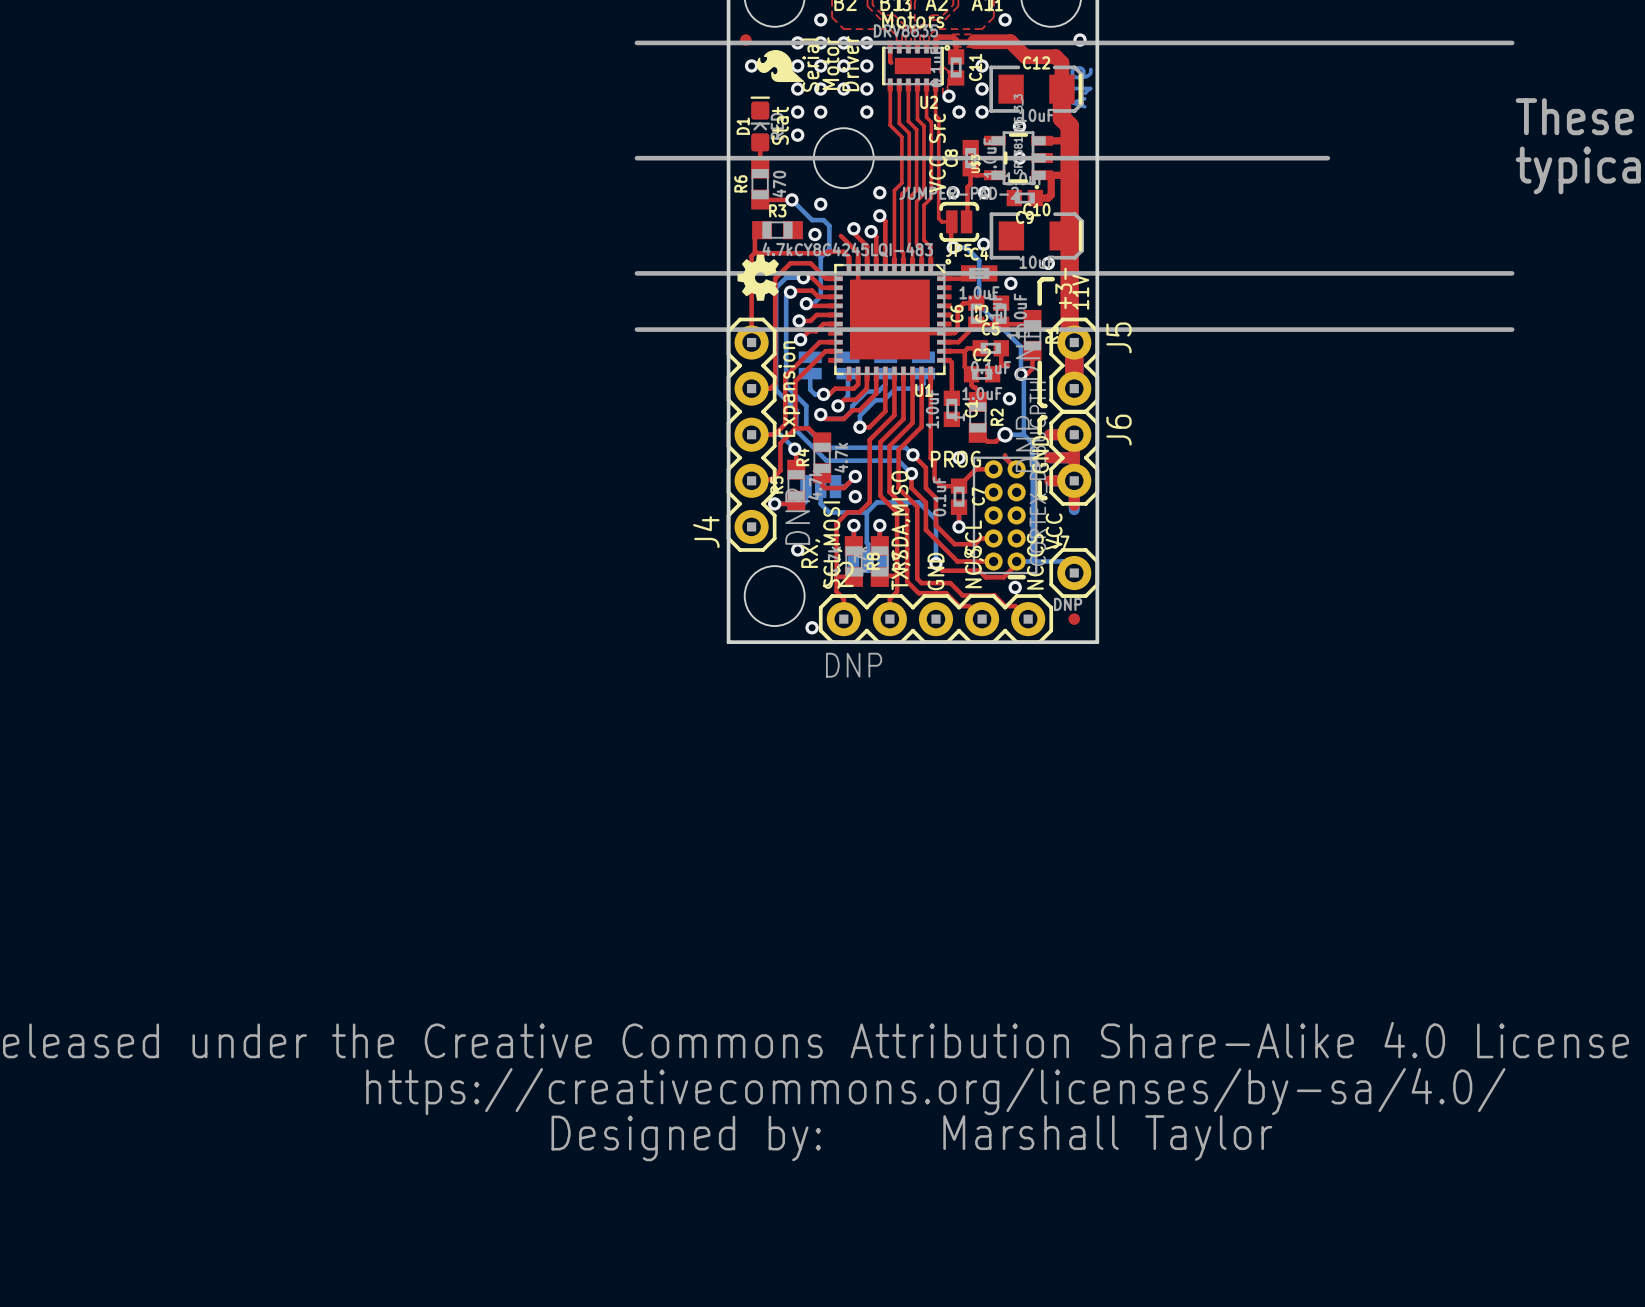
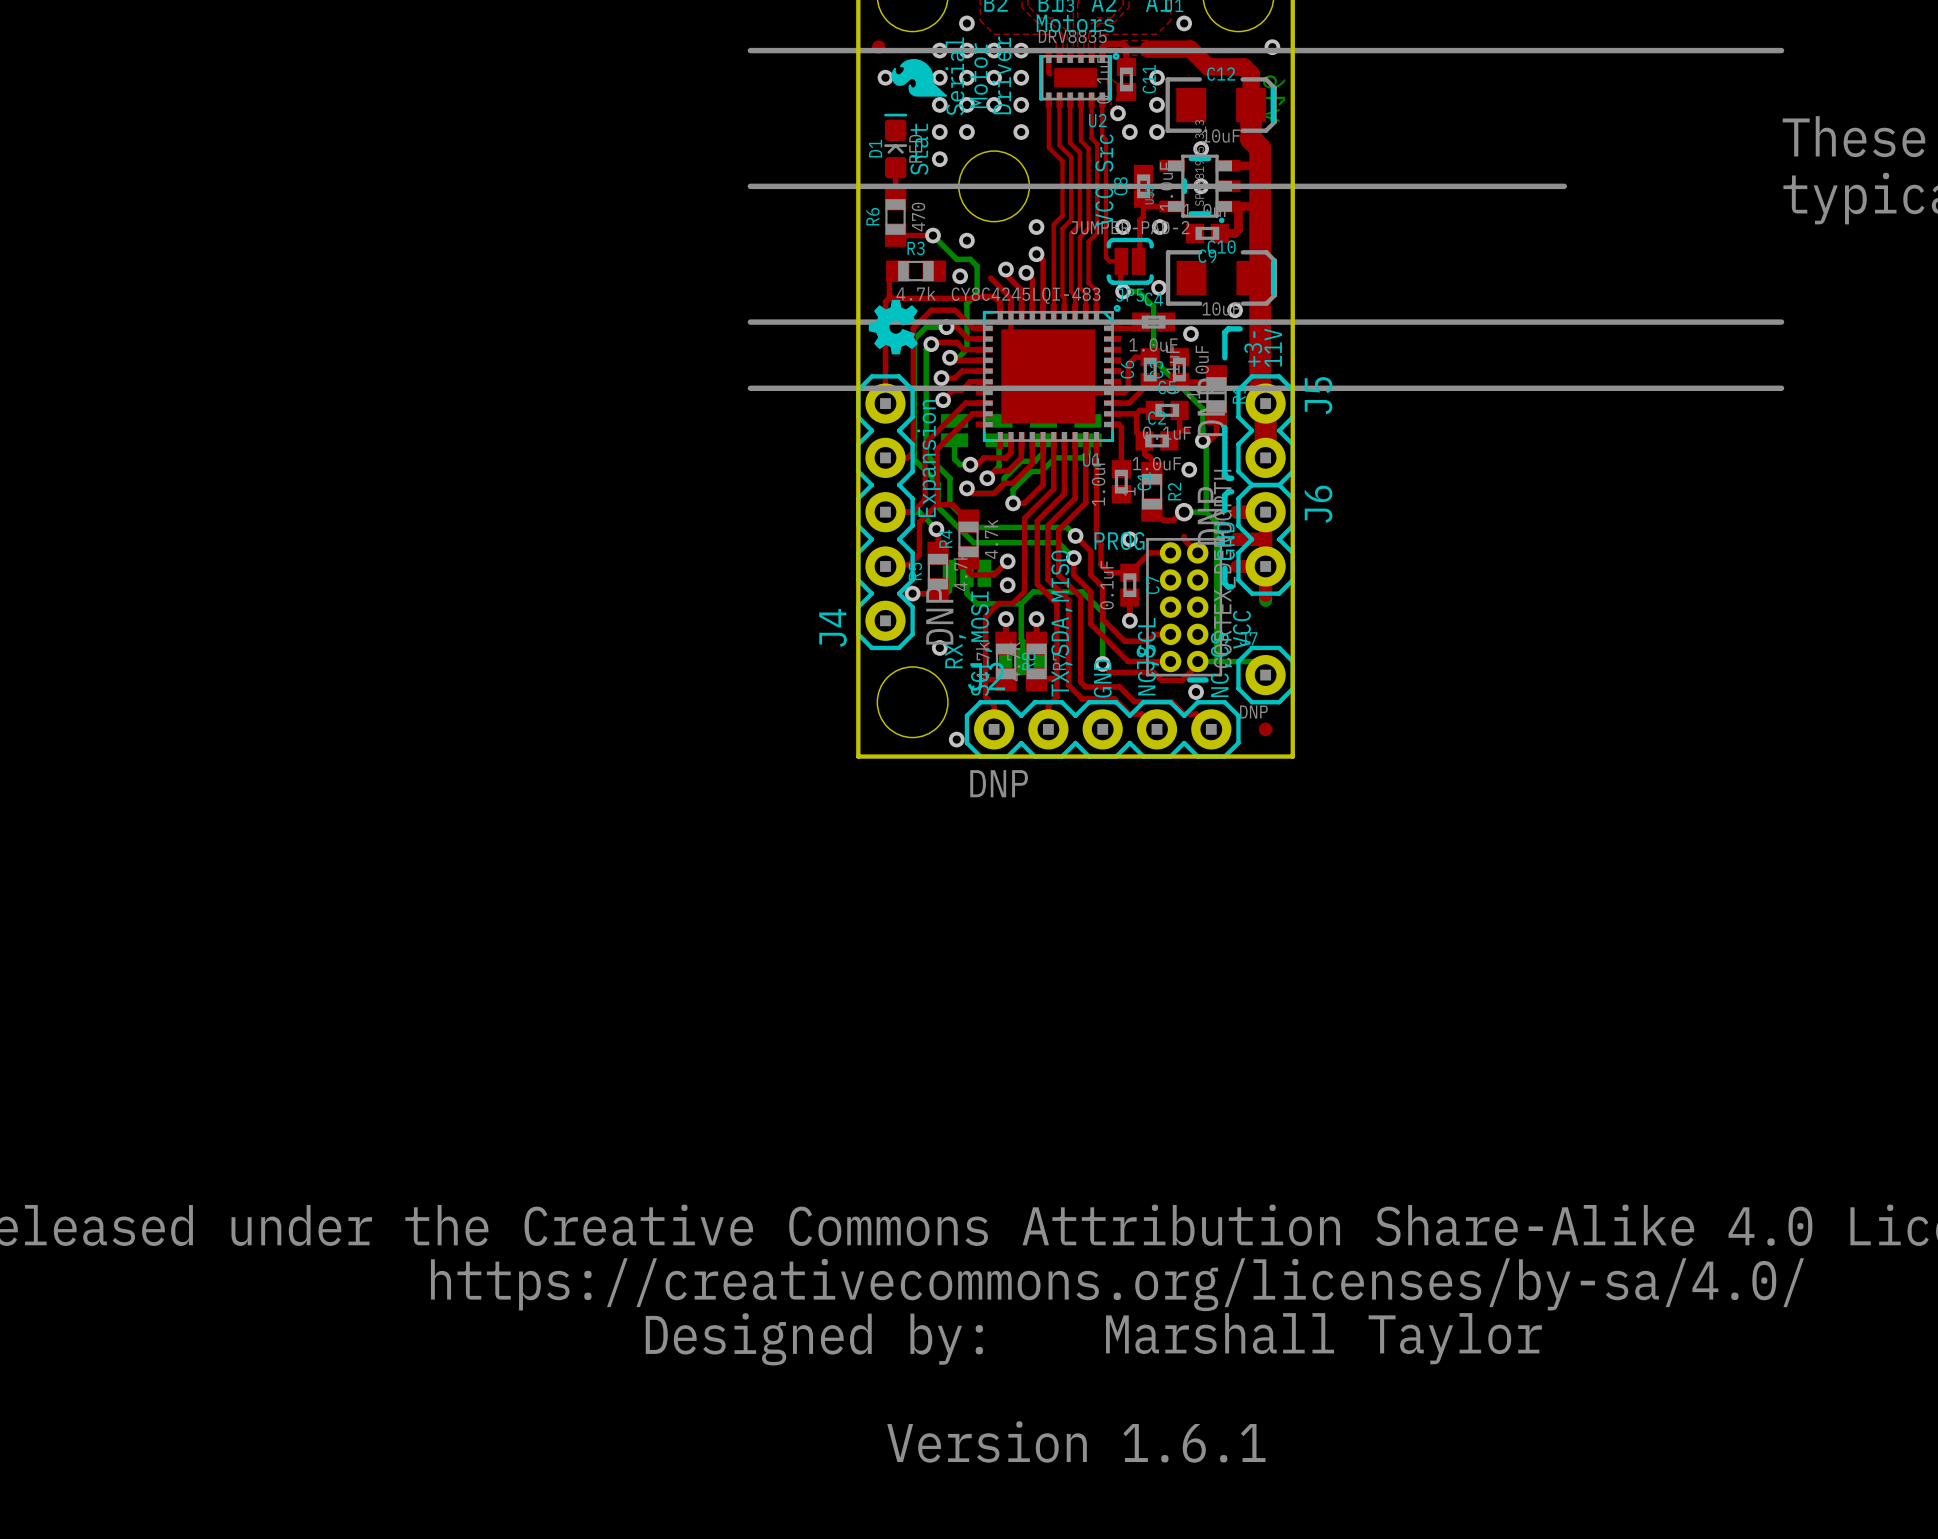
text: none -> Version 1.6.1 (1076, 1441)

